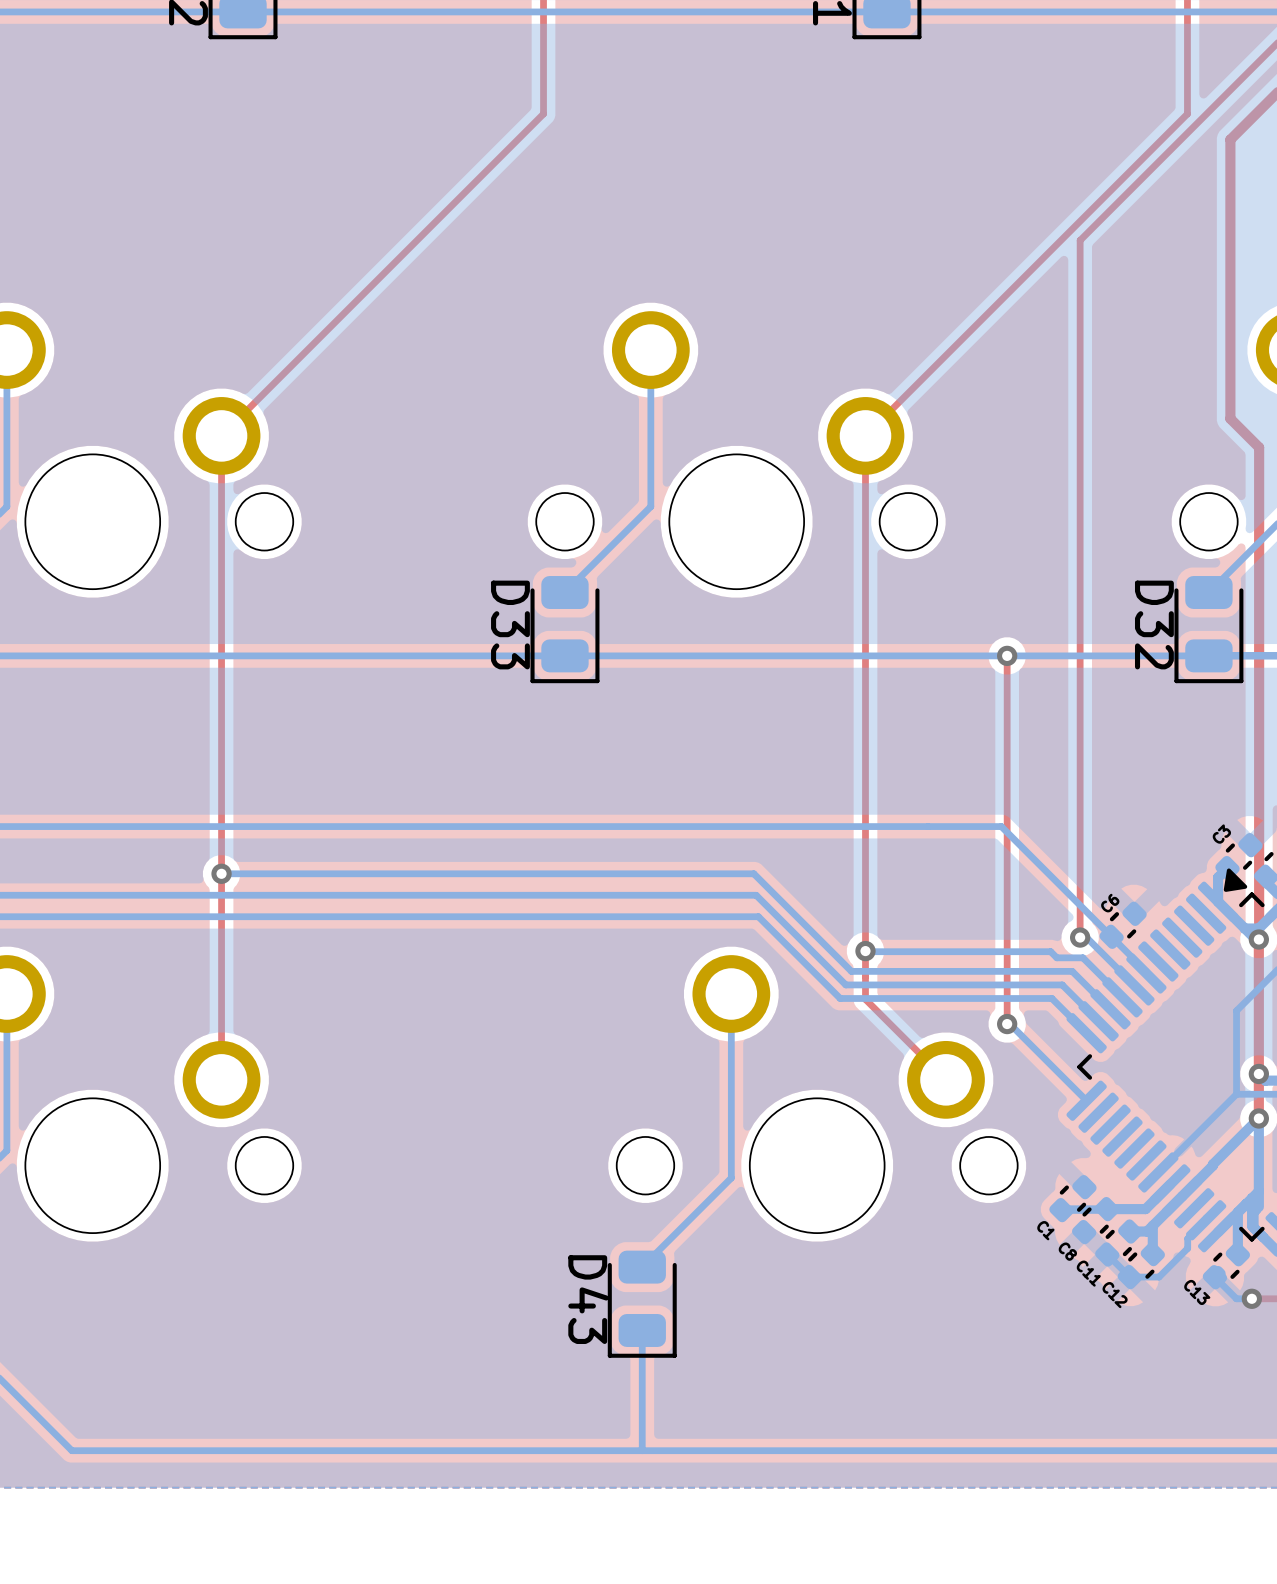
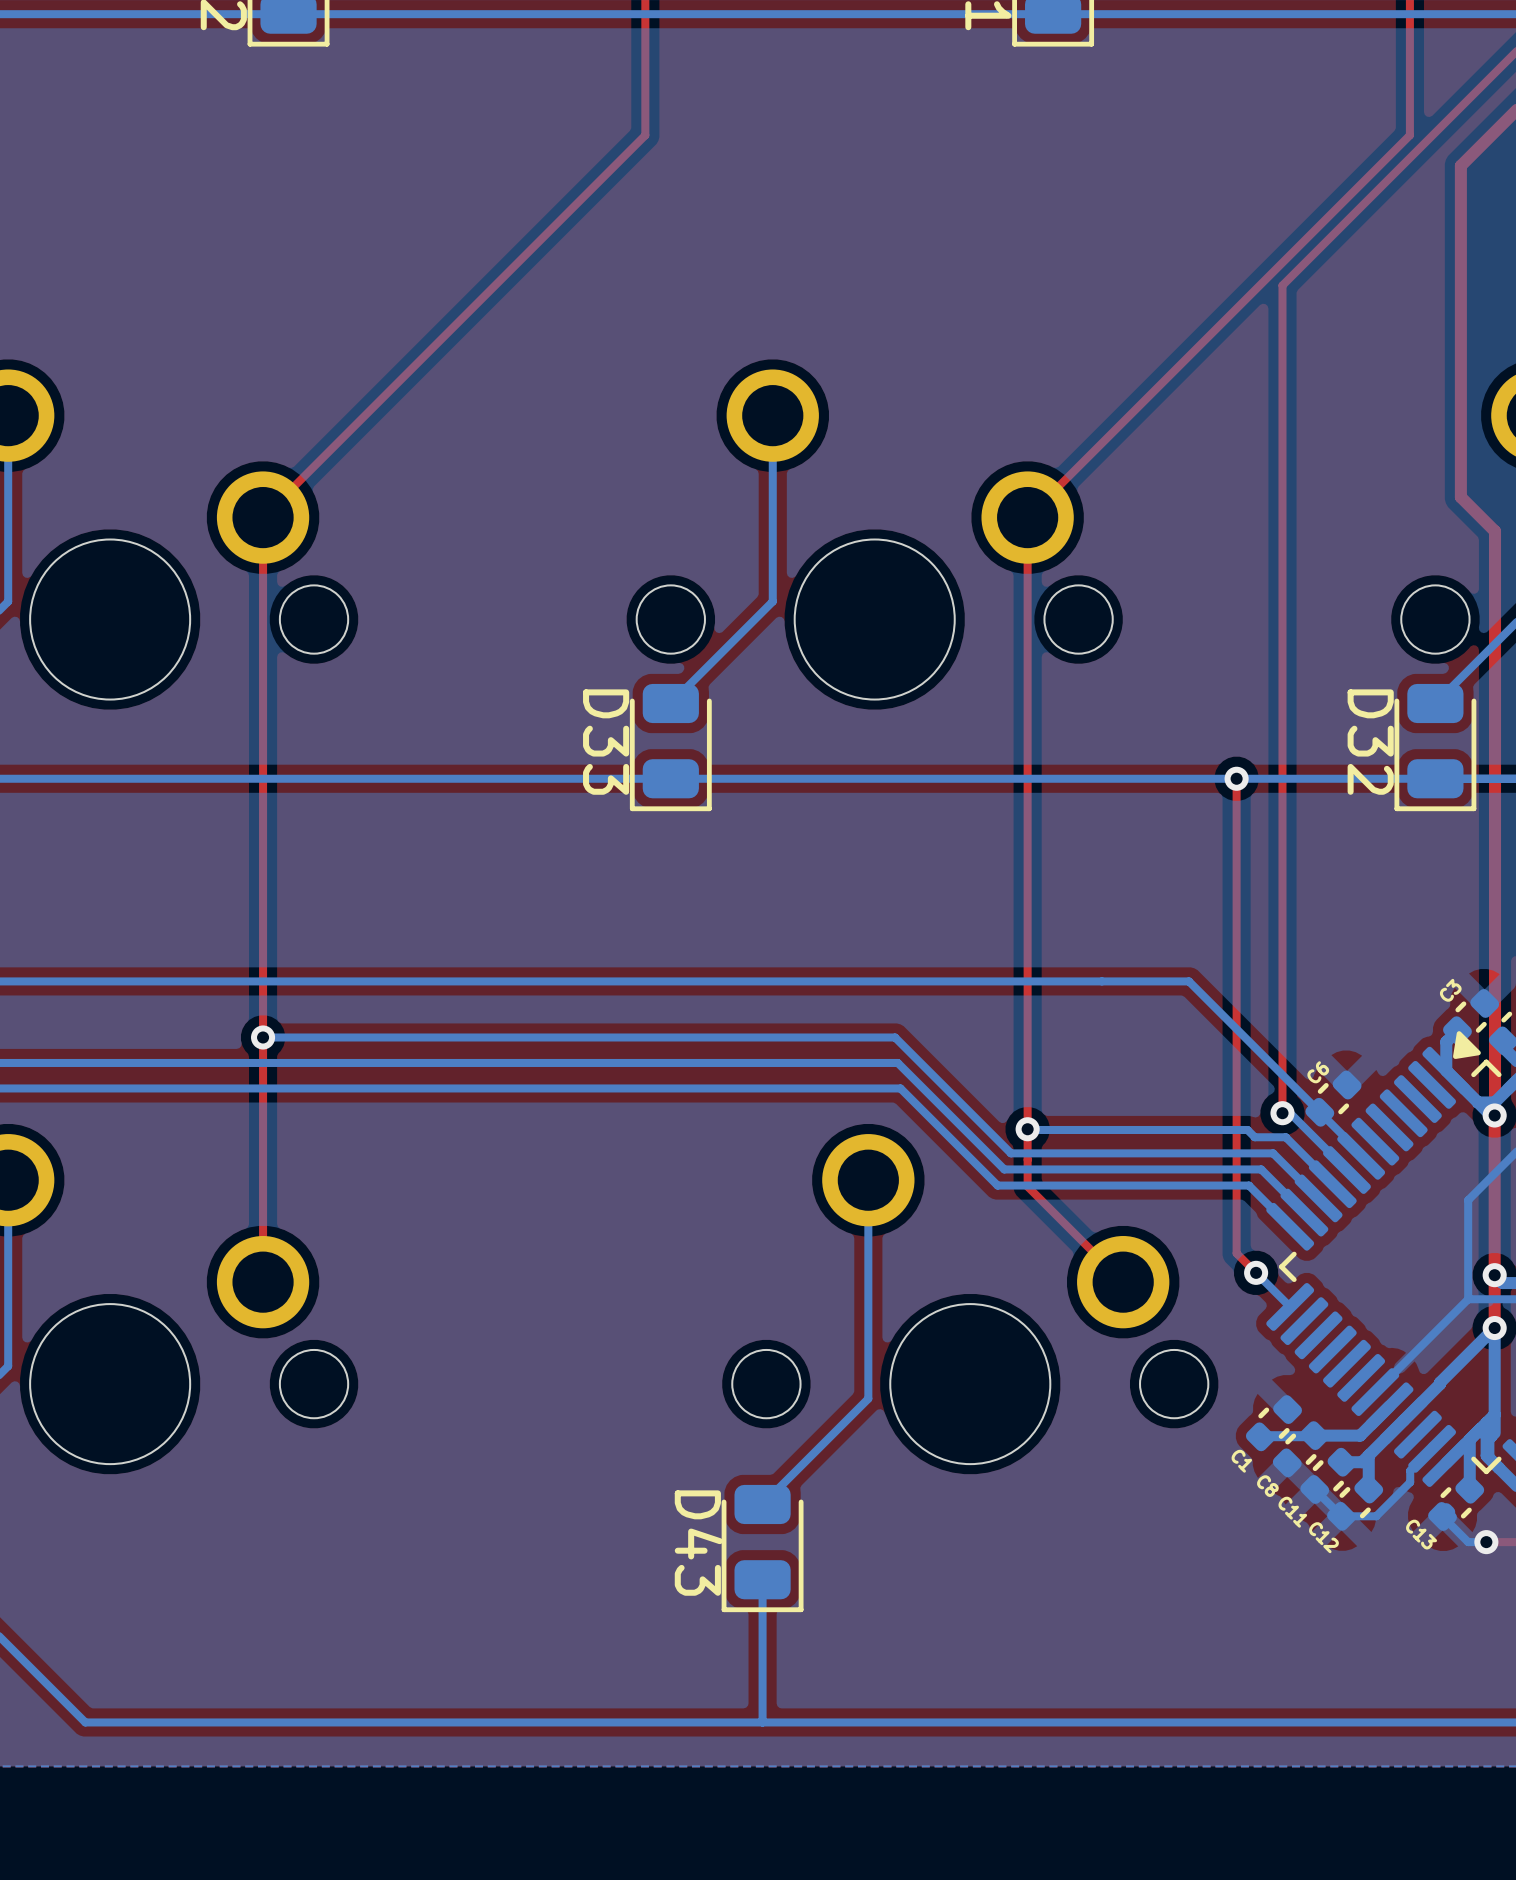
top track: (1007, 655) (1007, 1024) -> none
via position: (1007, 655) -> (1236, 778)
top track: none -> (1236, 778) (1236, 1253) (1256, 1272)
bottom track: (1007, 1024) (1009, 1024) (1057, 1072) -> none
via position: (1007, 1024) -> (1256, 1272)

